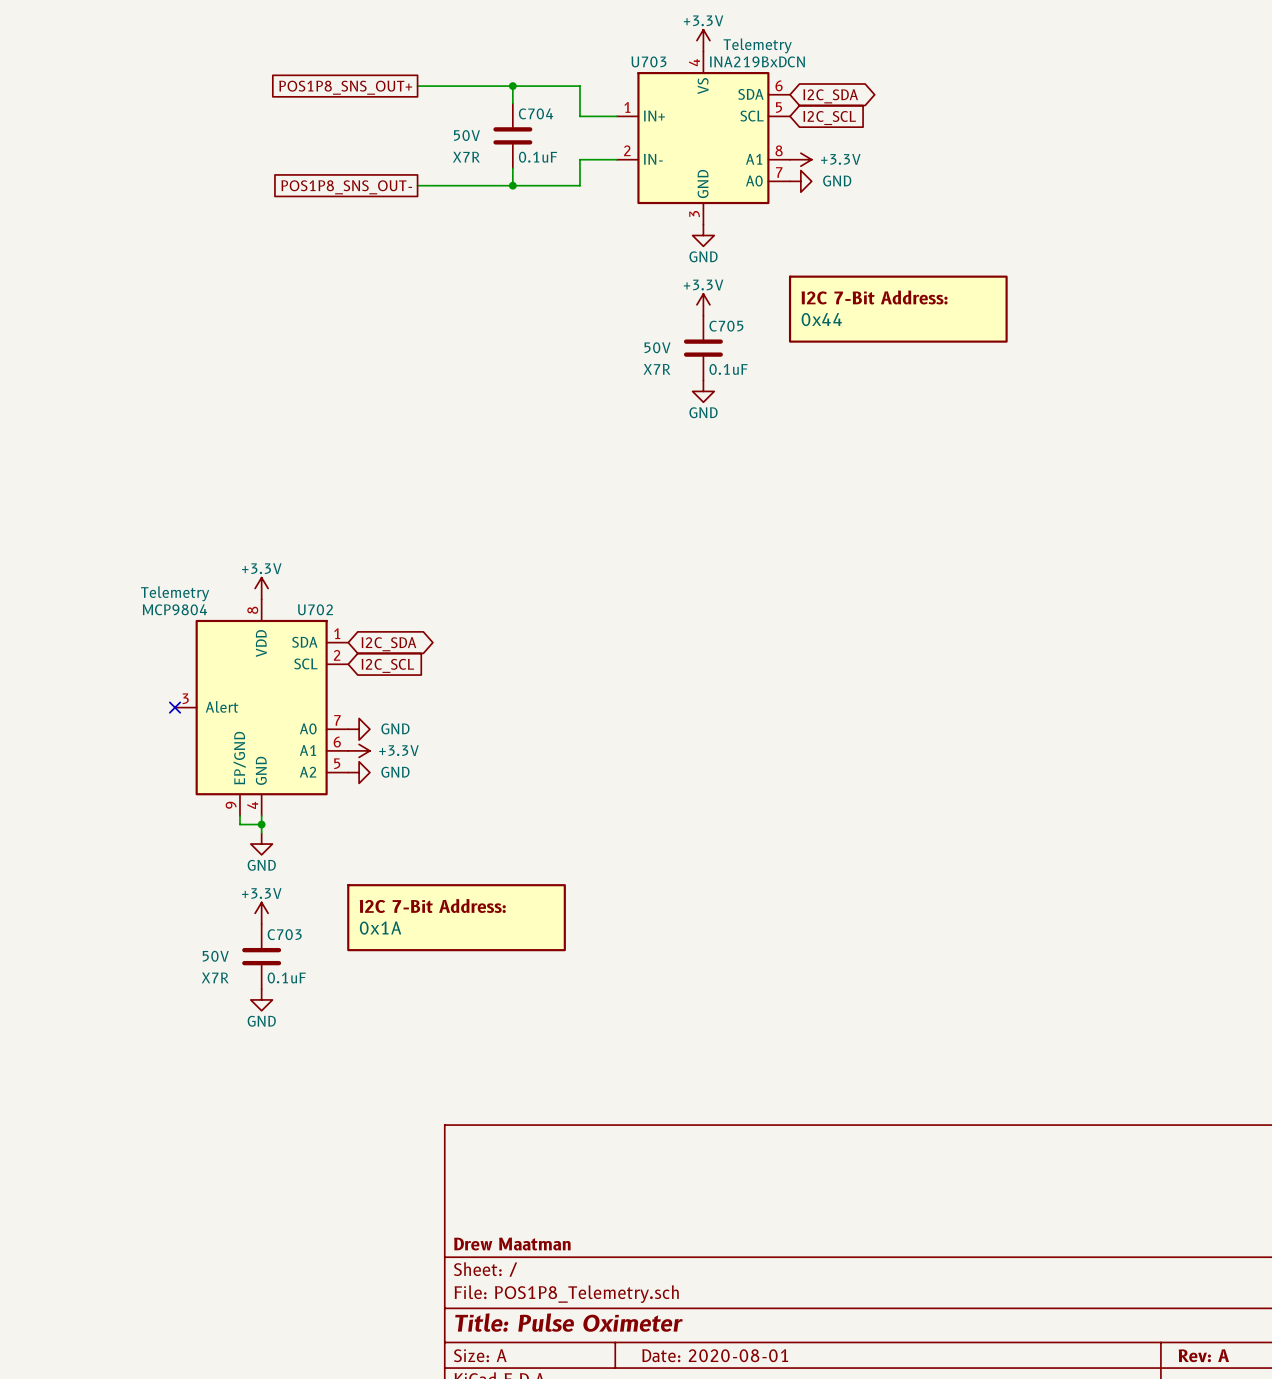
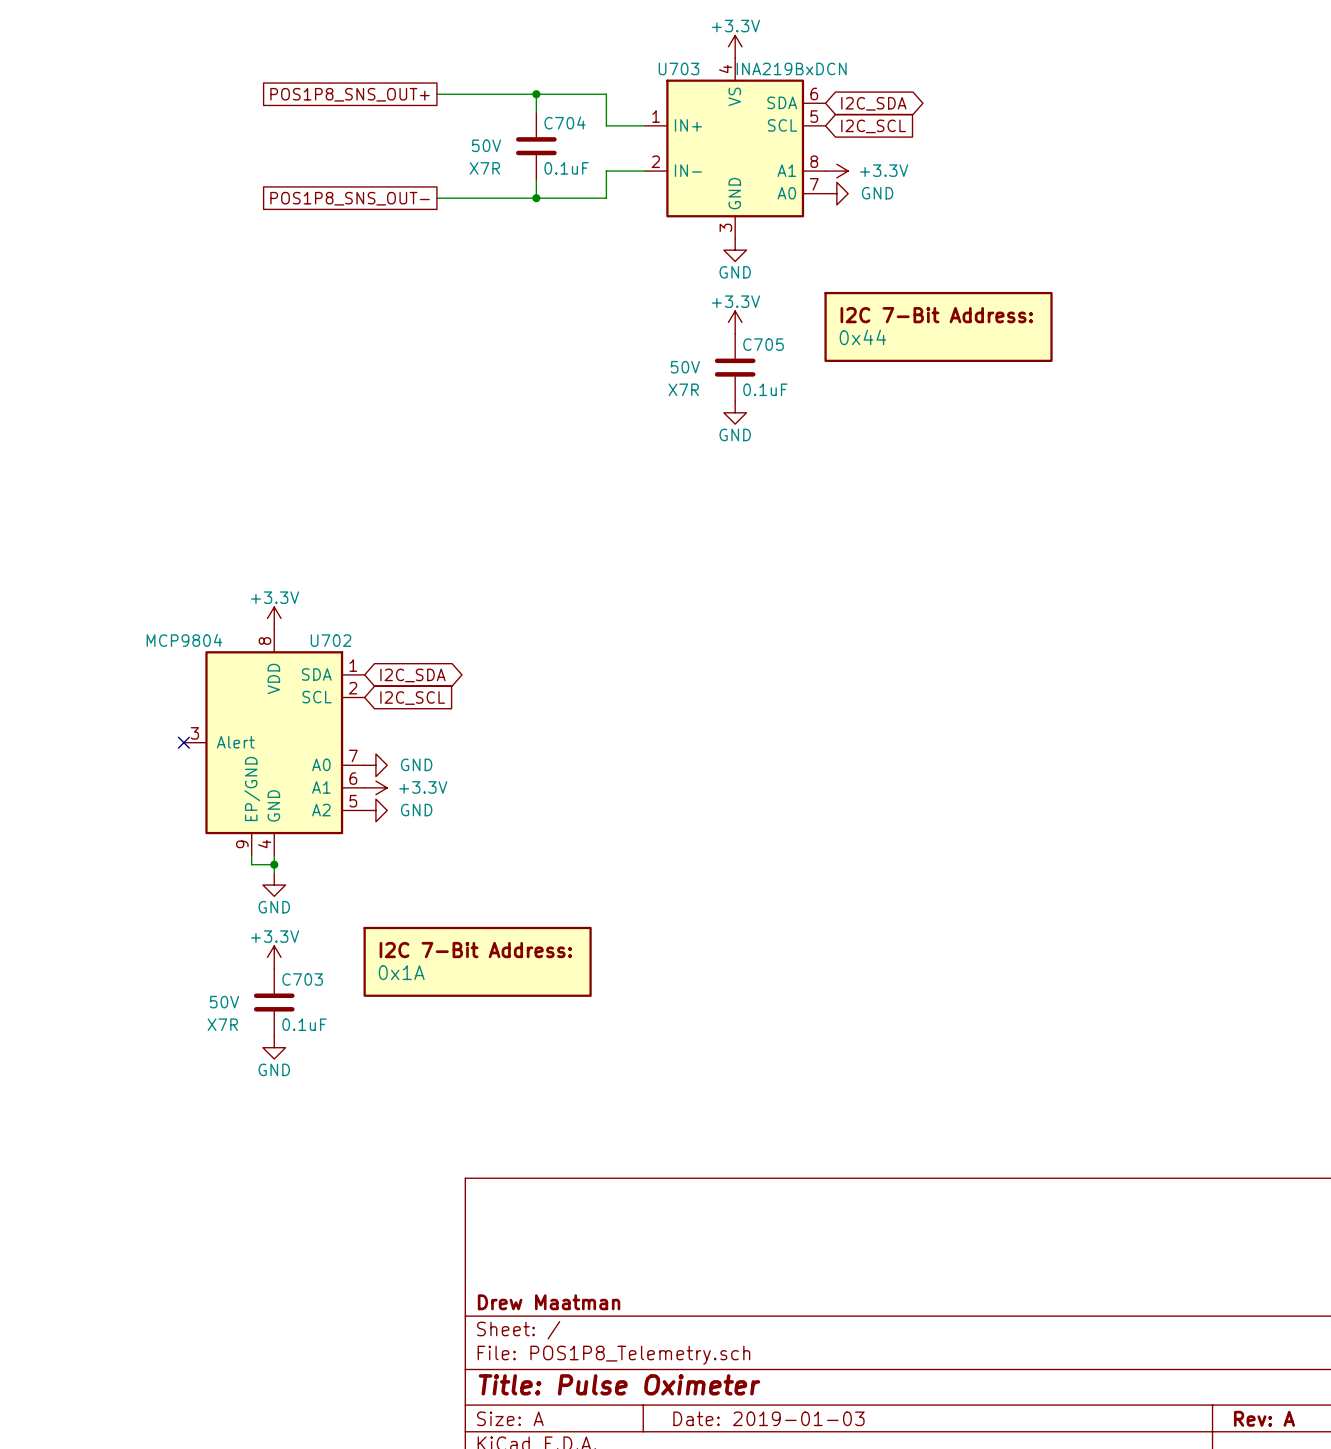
U703 text: Telemetry (757, 45) -> none
U702 text: Telemetry (175, 593) -> none
title block: Date: 2020-08-01 (715, 1355) -> Date: 2019-01-03 (768, 1418)

